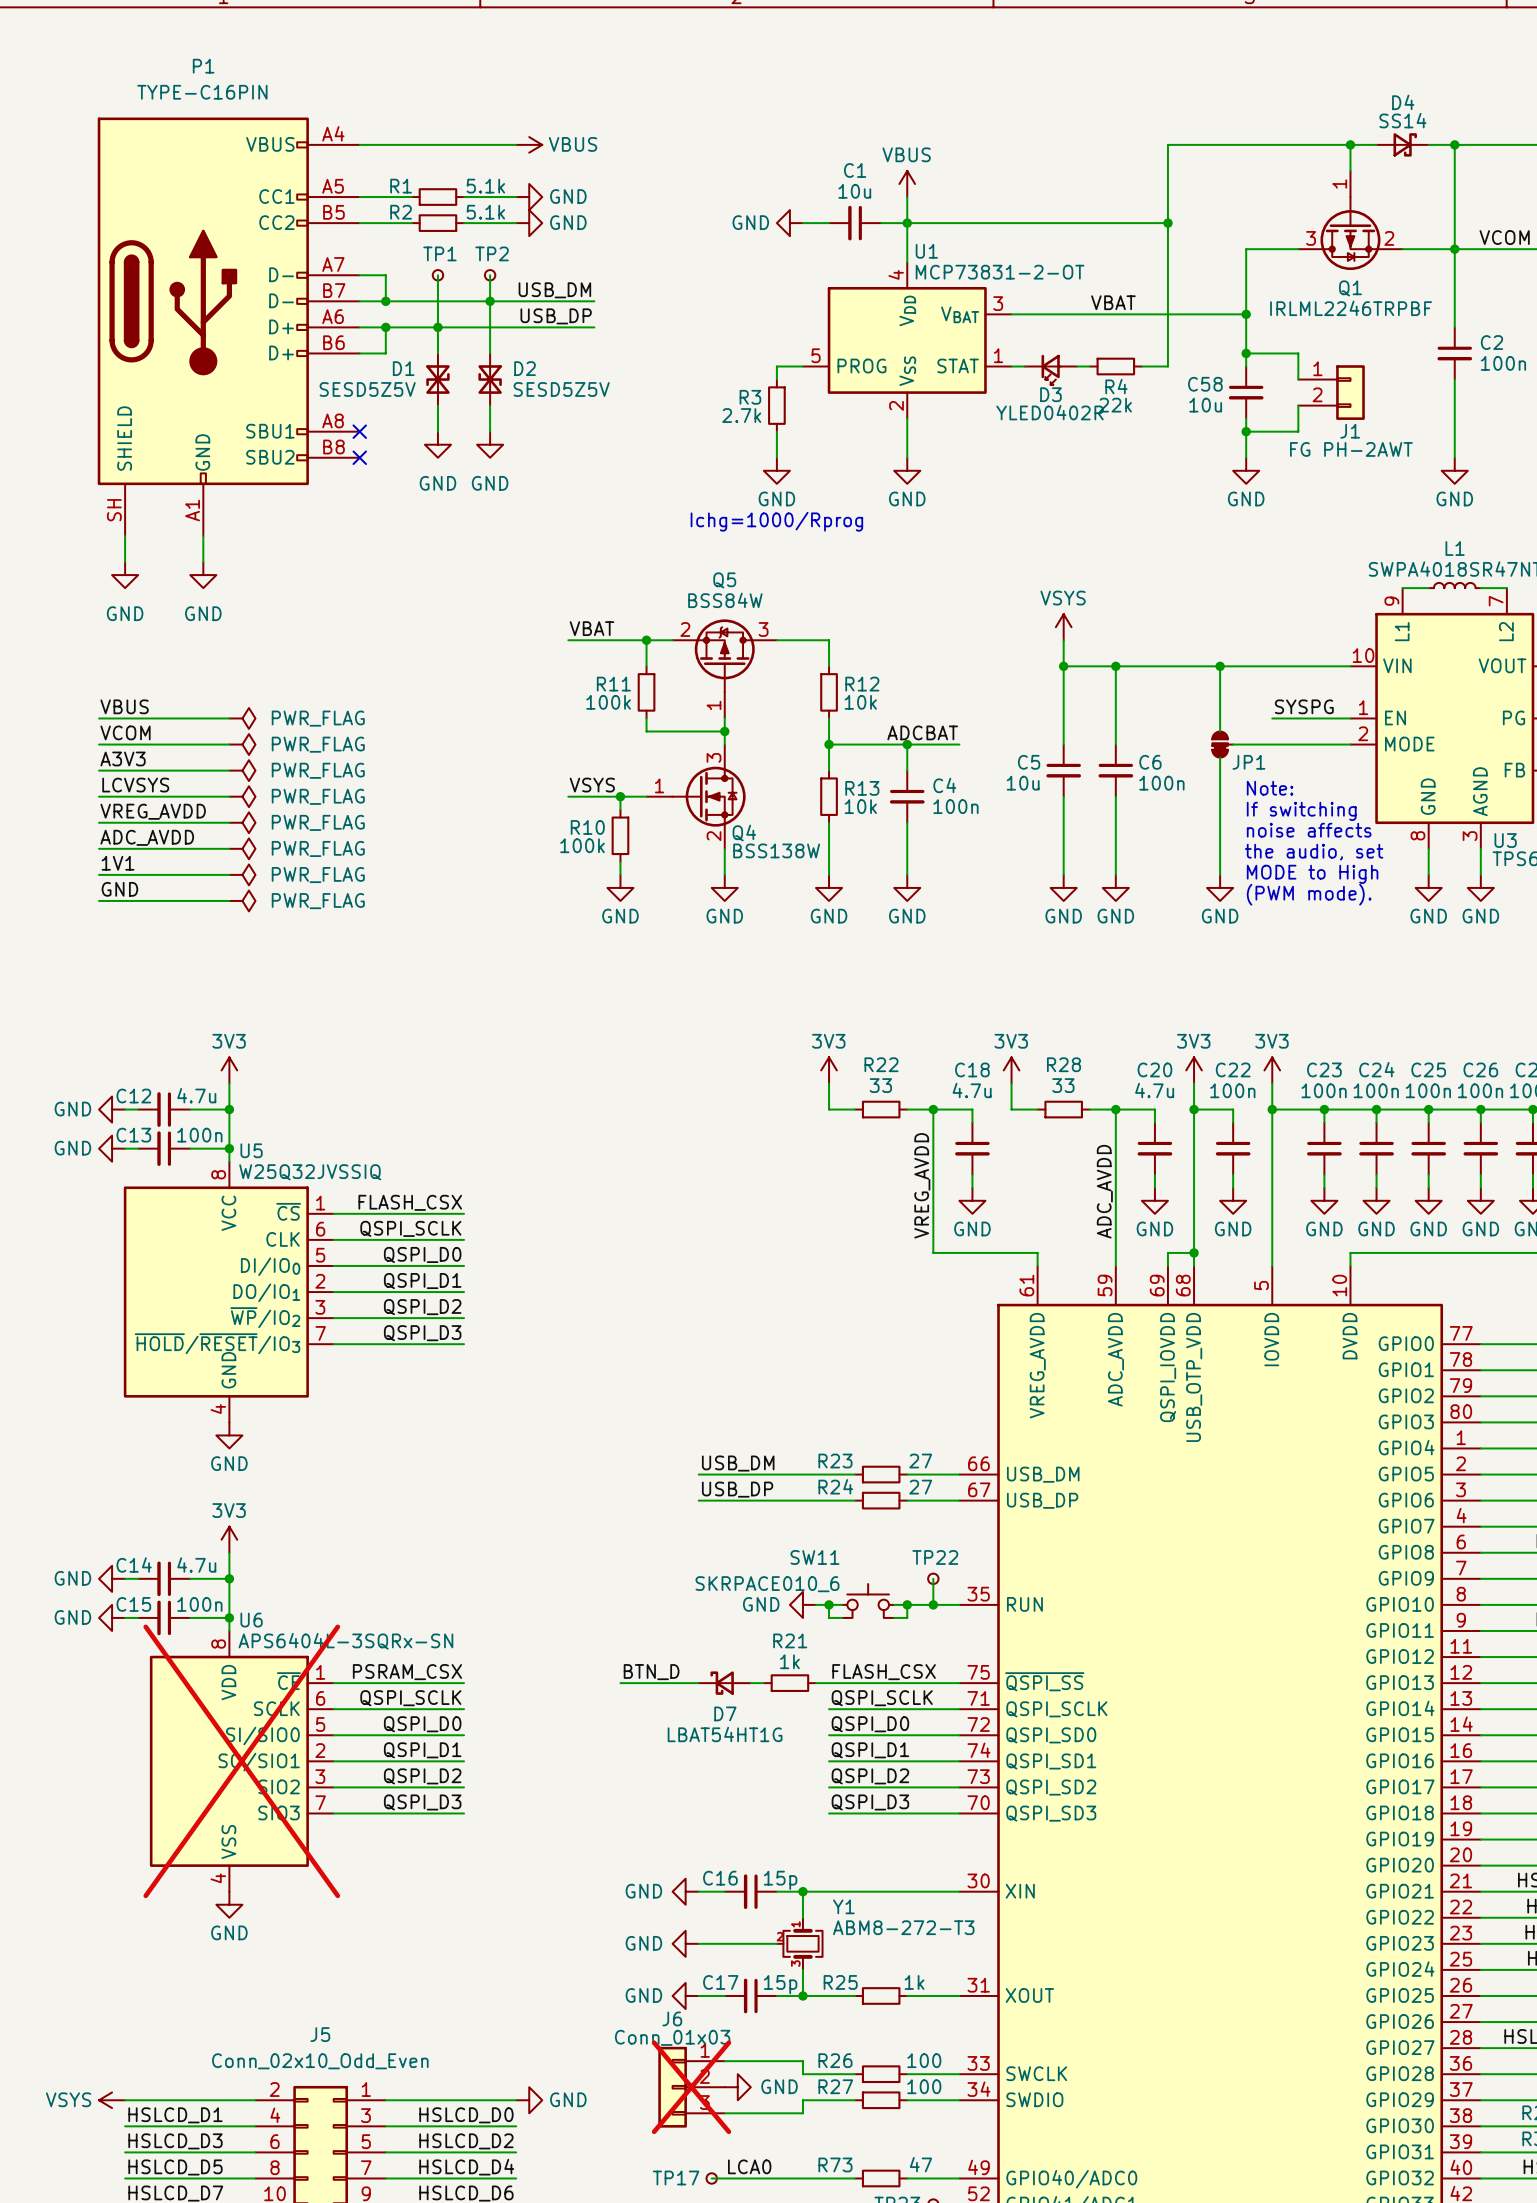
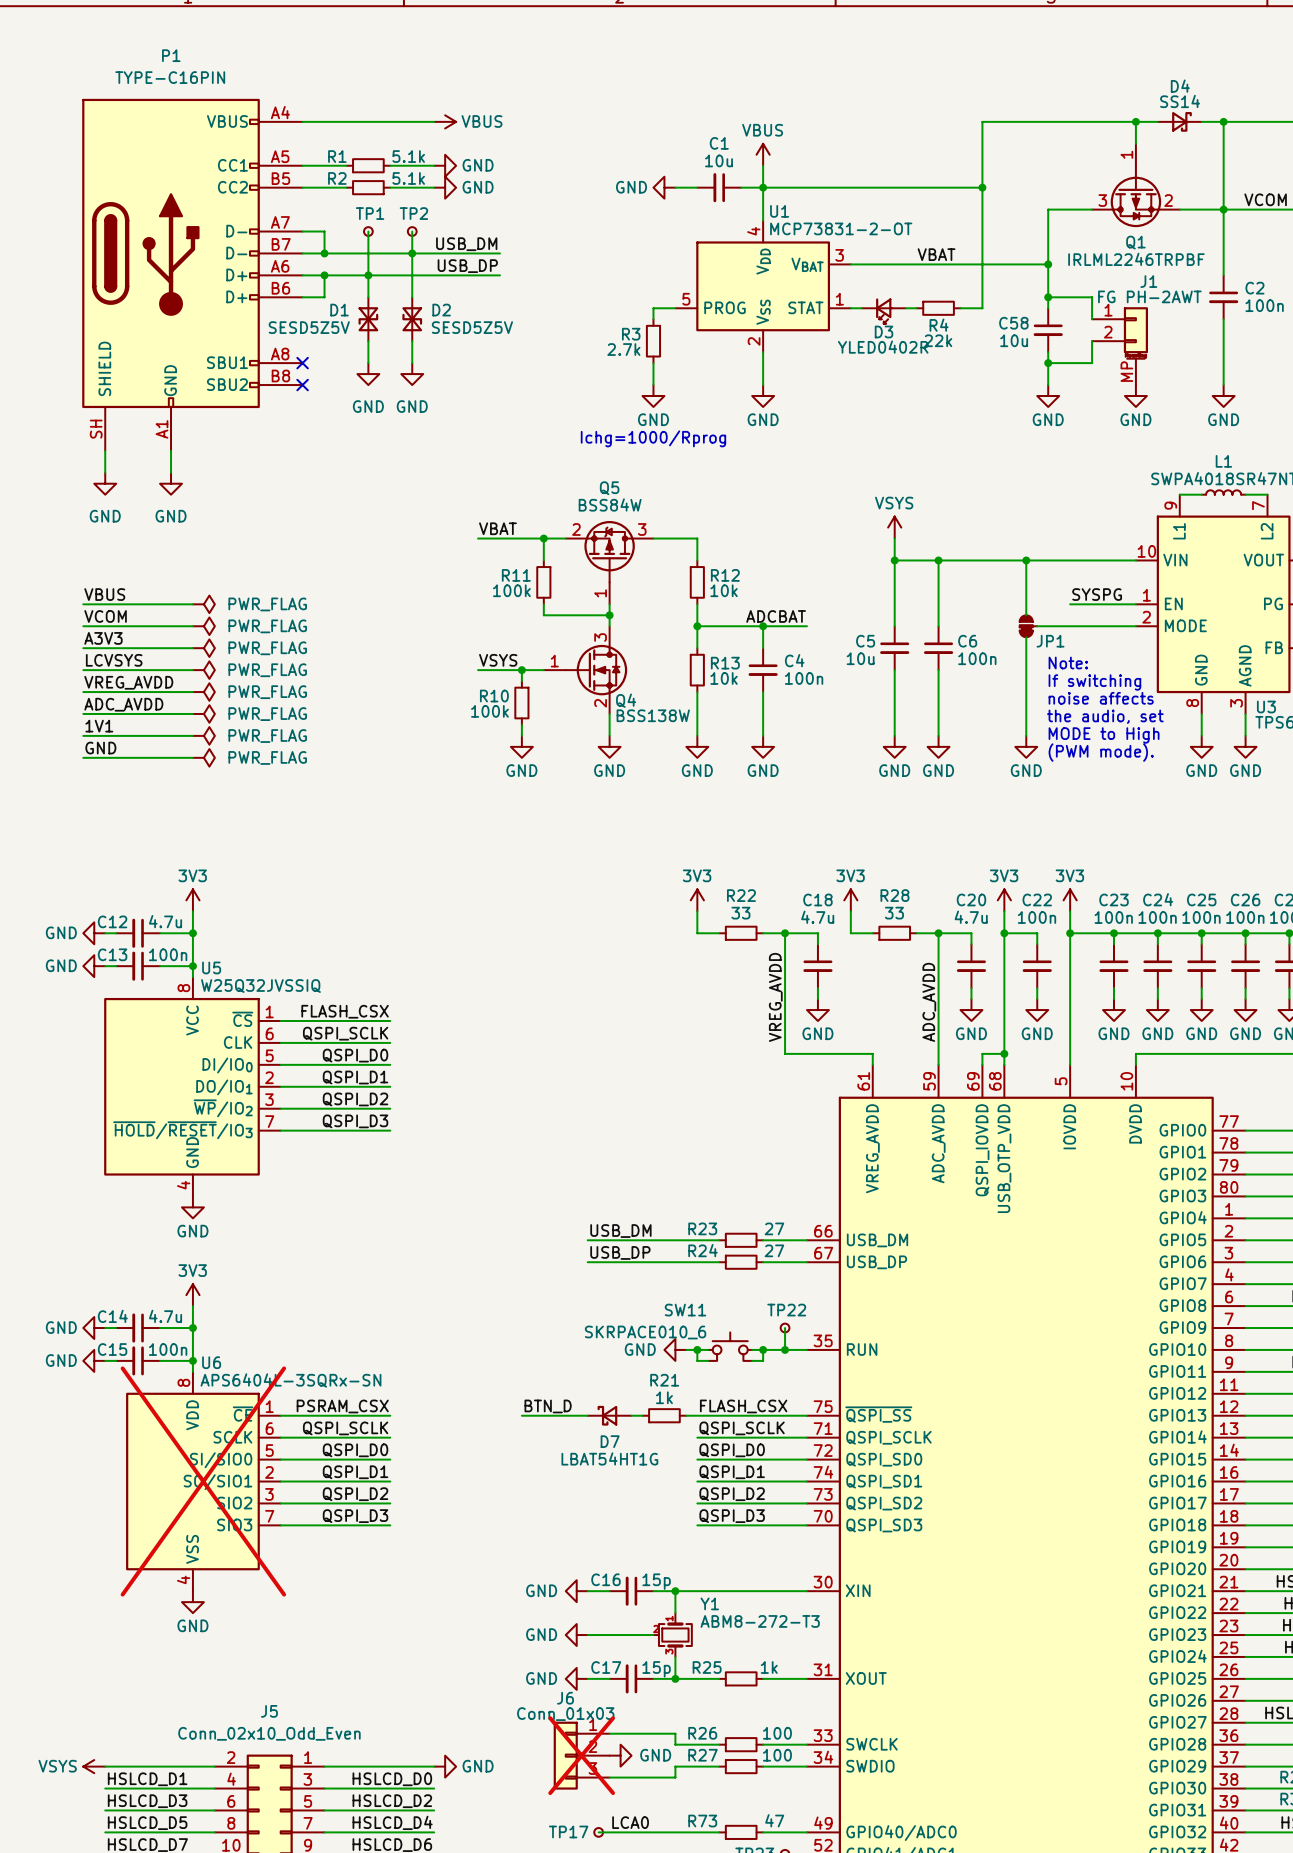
J1 symbol: [1298, 365, 1365, 420] -> [1092, 307, 1148, 386]
J1 name position: J1 (1350, 431) -> J1 (1148, 281)
J1 value position: FG PH-2AWT (1351, 449) -> FG PH-2AWT (1149, 296)
power symbol: none -> GND (1135, 395)

